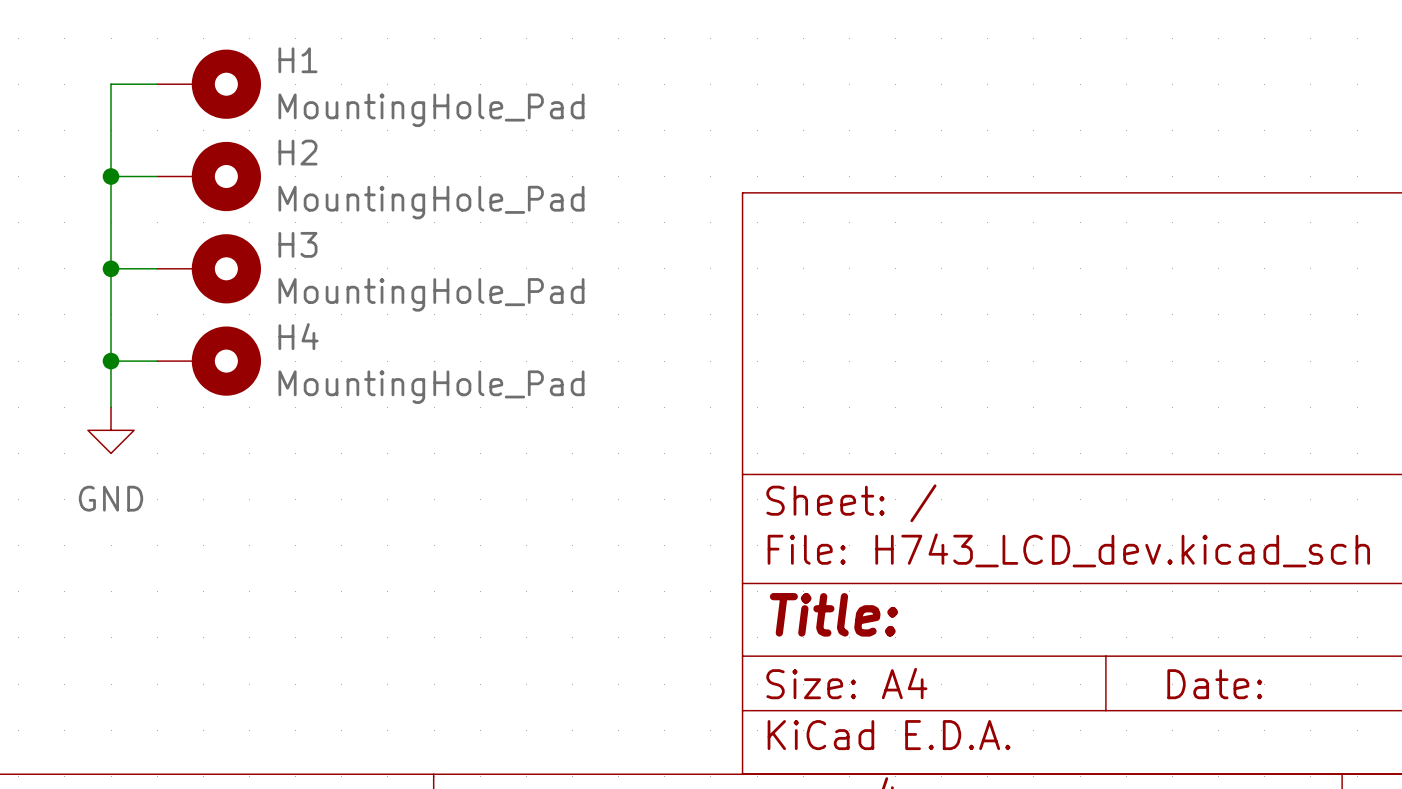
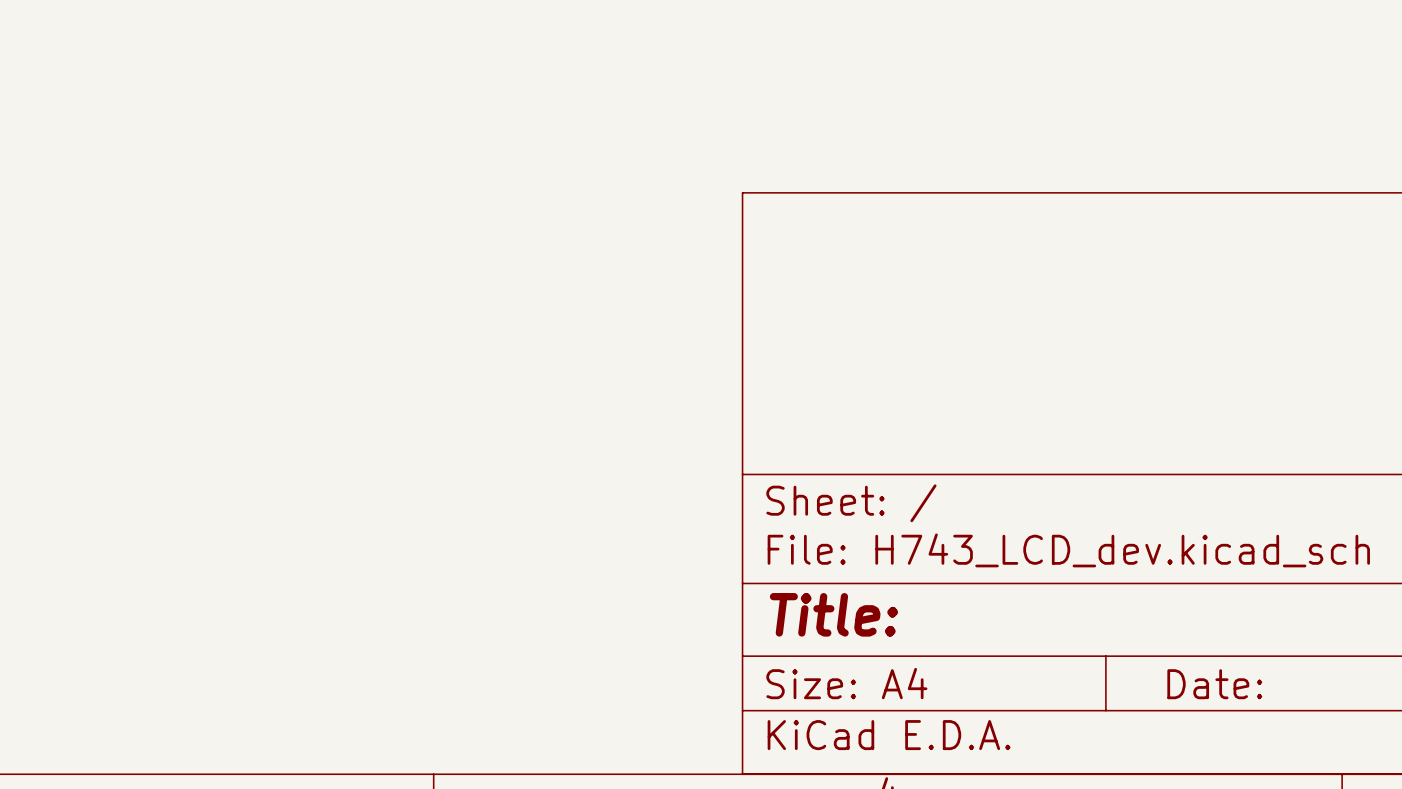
wire: (157, 84) (111, 84) (111, 407) -> none
H1: MountingHole_Pad (209, 84) -> none
wire: (111, 176) (157, 176) -> none
junction: (111, 176) -> none
H2: MountingHole_Pad (209, 176) -> none
wire: (111, 268) (157, 268) -> none
junction: (111, 268) -> none
H3: MountingHole_Pad (209, 268) -> none
wire: (111, 361) (157, 361) -> none
junction: (111, 361) -> none
H4: MountingHole_Pad (209, 361) -> none
power symbol: GND (111, 430) -> none

